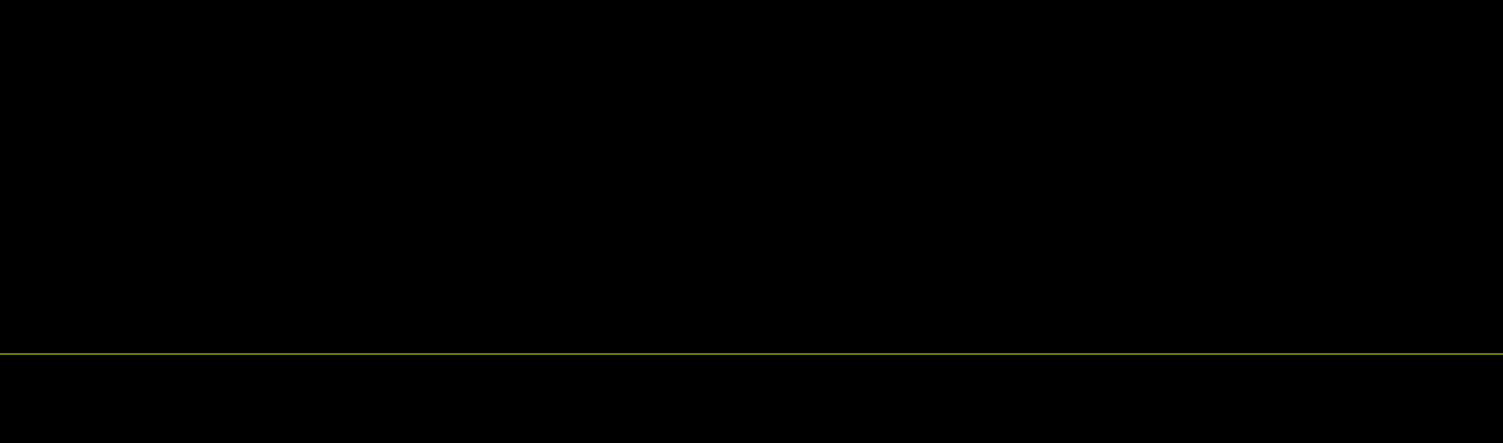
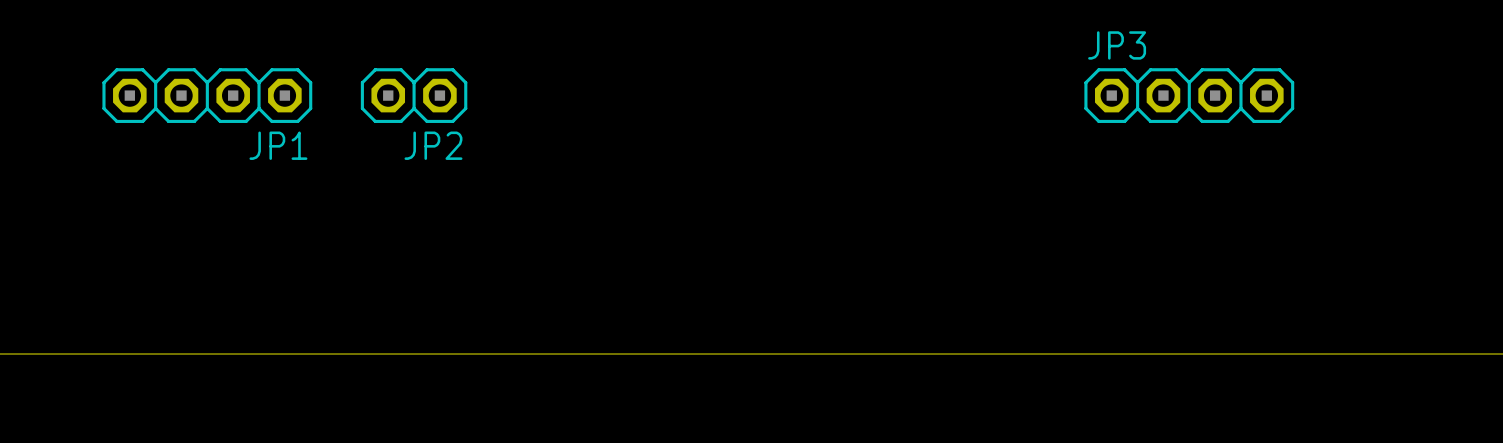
JP1: none -> (207, 95)
JP2: none -> (414, 95)
JP3: none -> (1189, 95)

